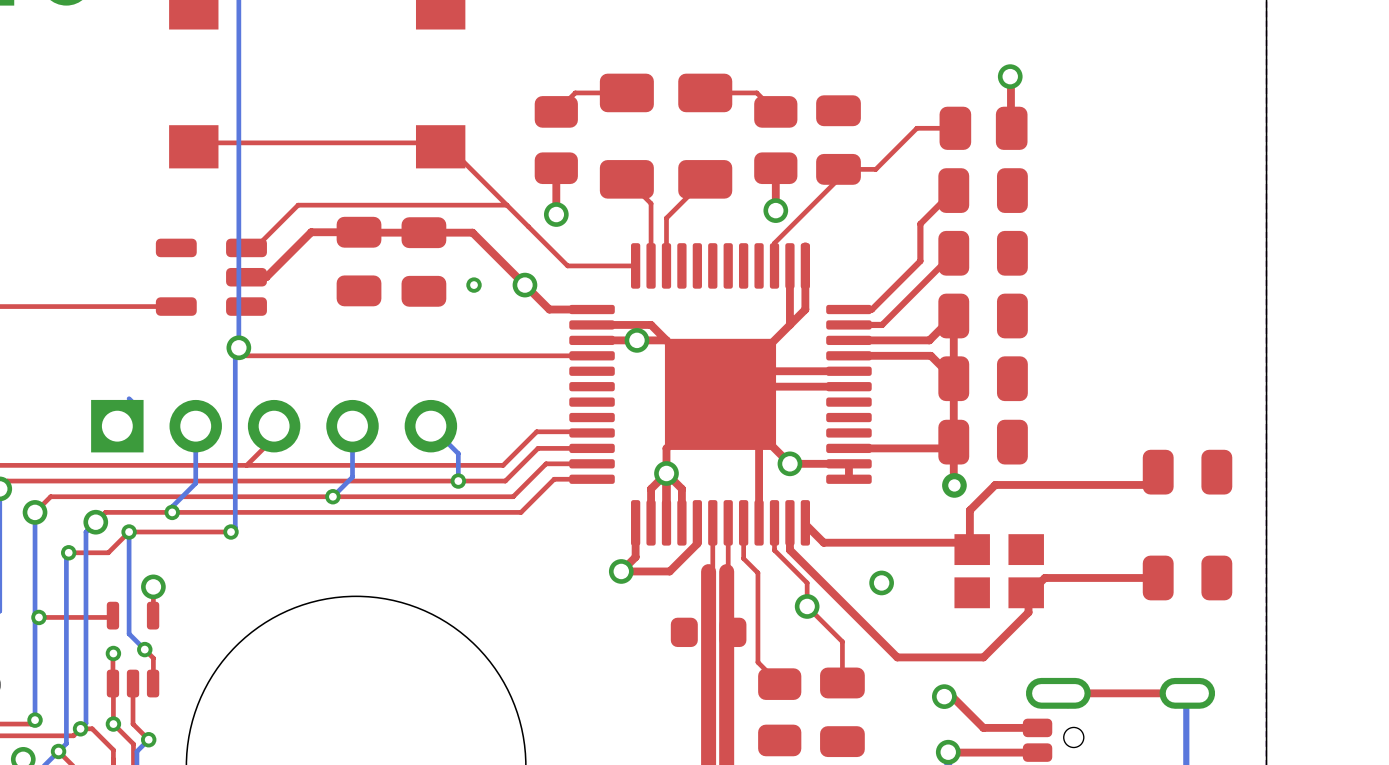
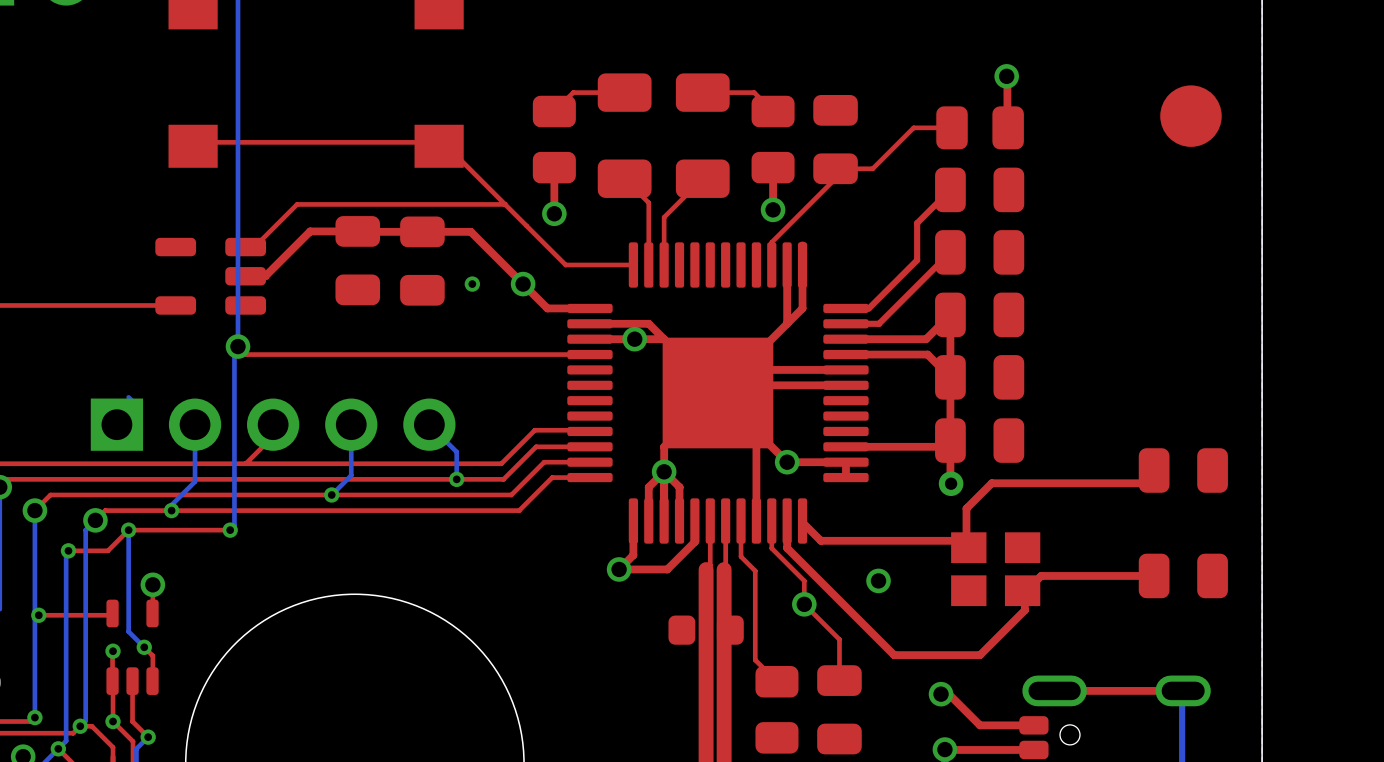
part: none -> (1190, 116)

